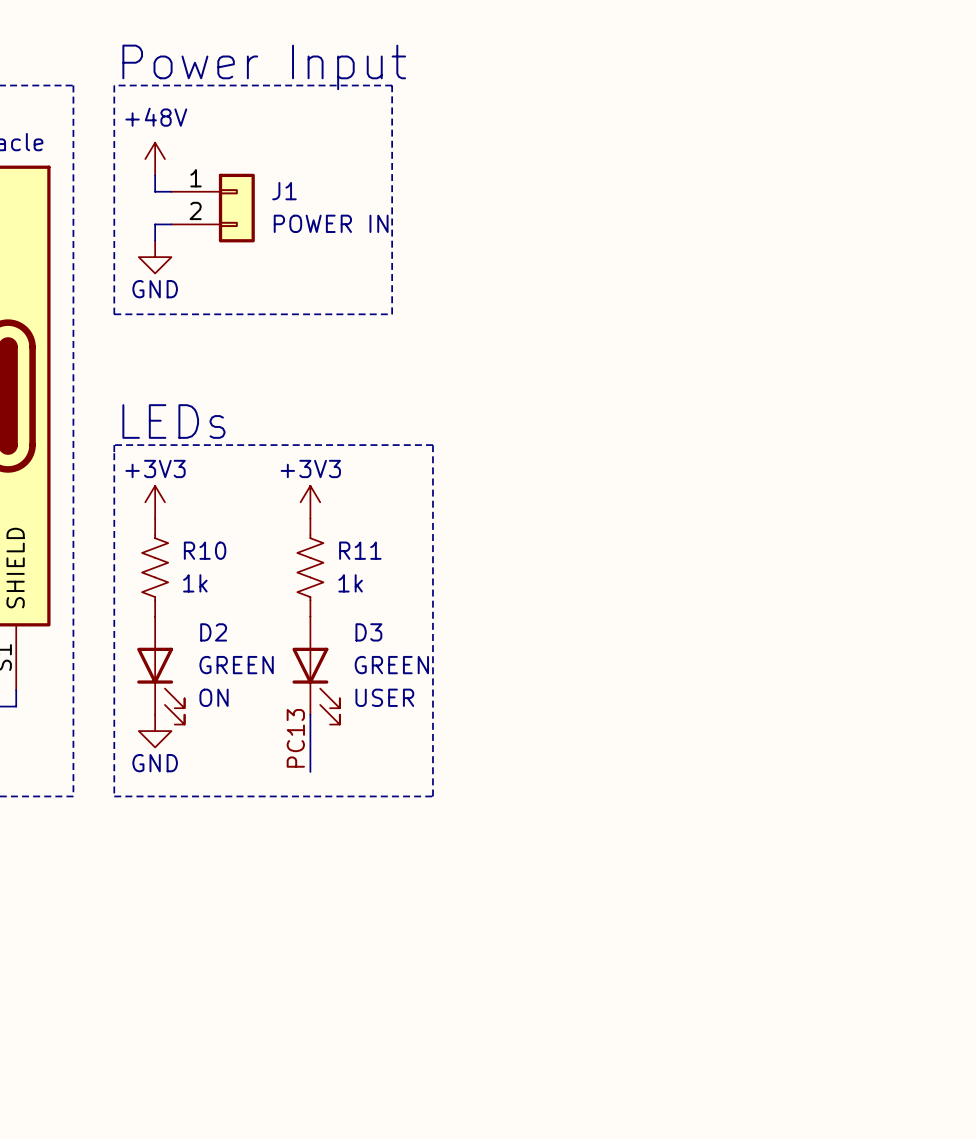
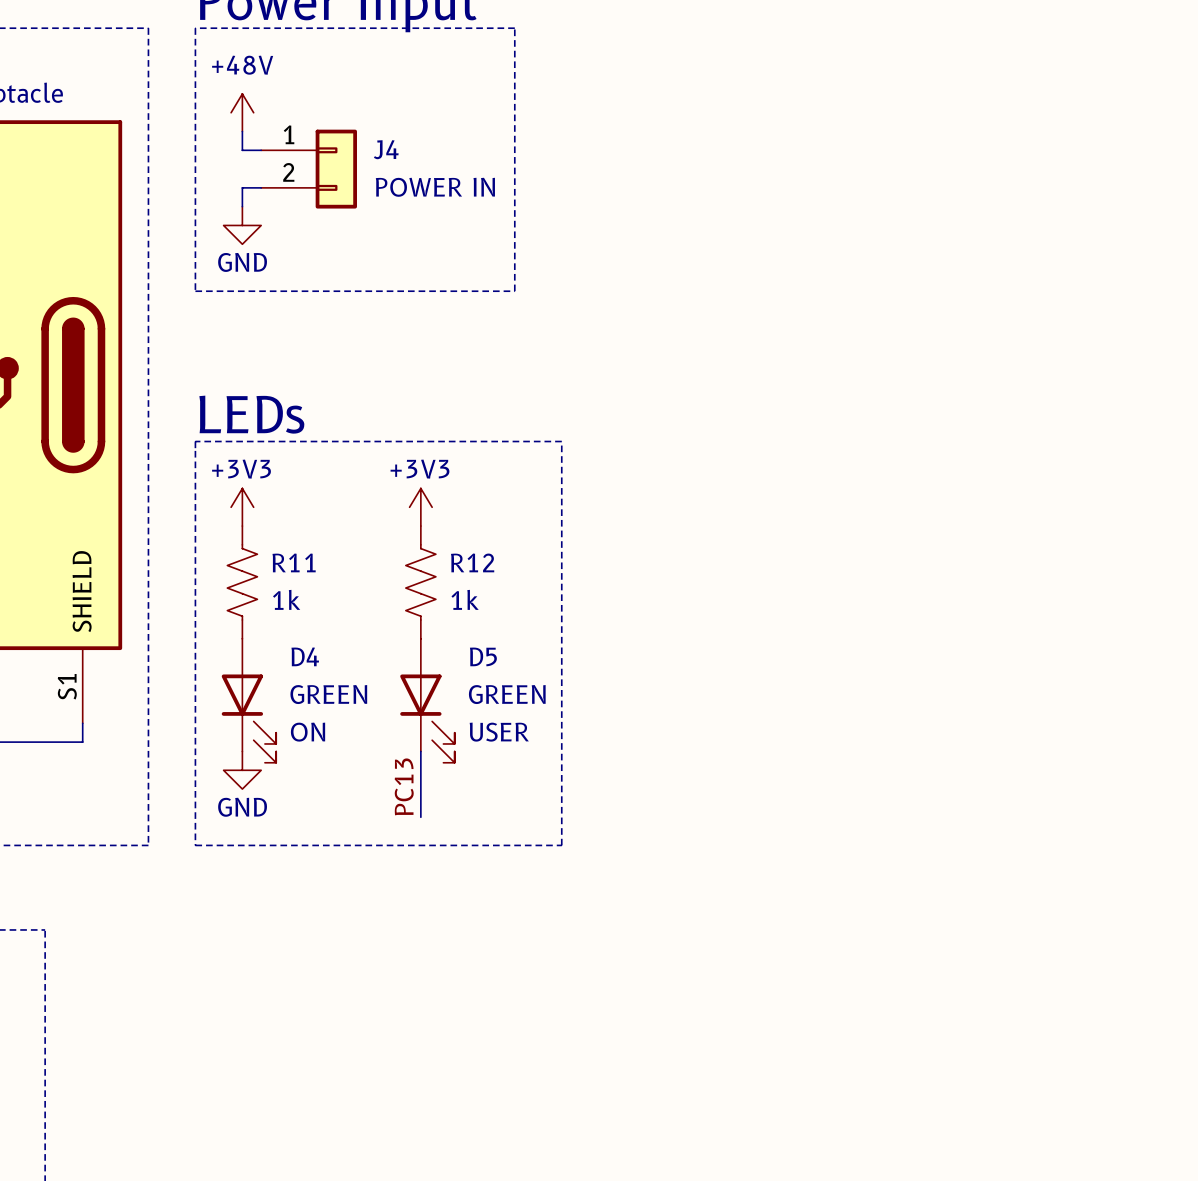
J1 name: J1 (284, 191) -> J4 (386, 149)
R10 name: R10 (205, 550) -> R11 (294, 562)
R11 name: R11 (360, 550) -> R12 (472, 562)
D2 name: D2 (213, 632) -> D4 (305, 656)
D3 name: D3 (368, 632) -> D5 (483, 656)

